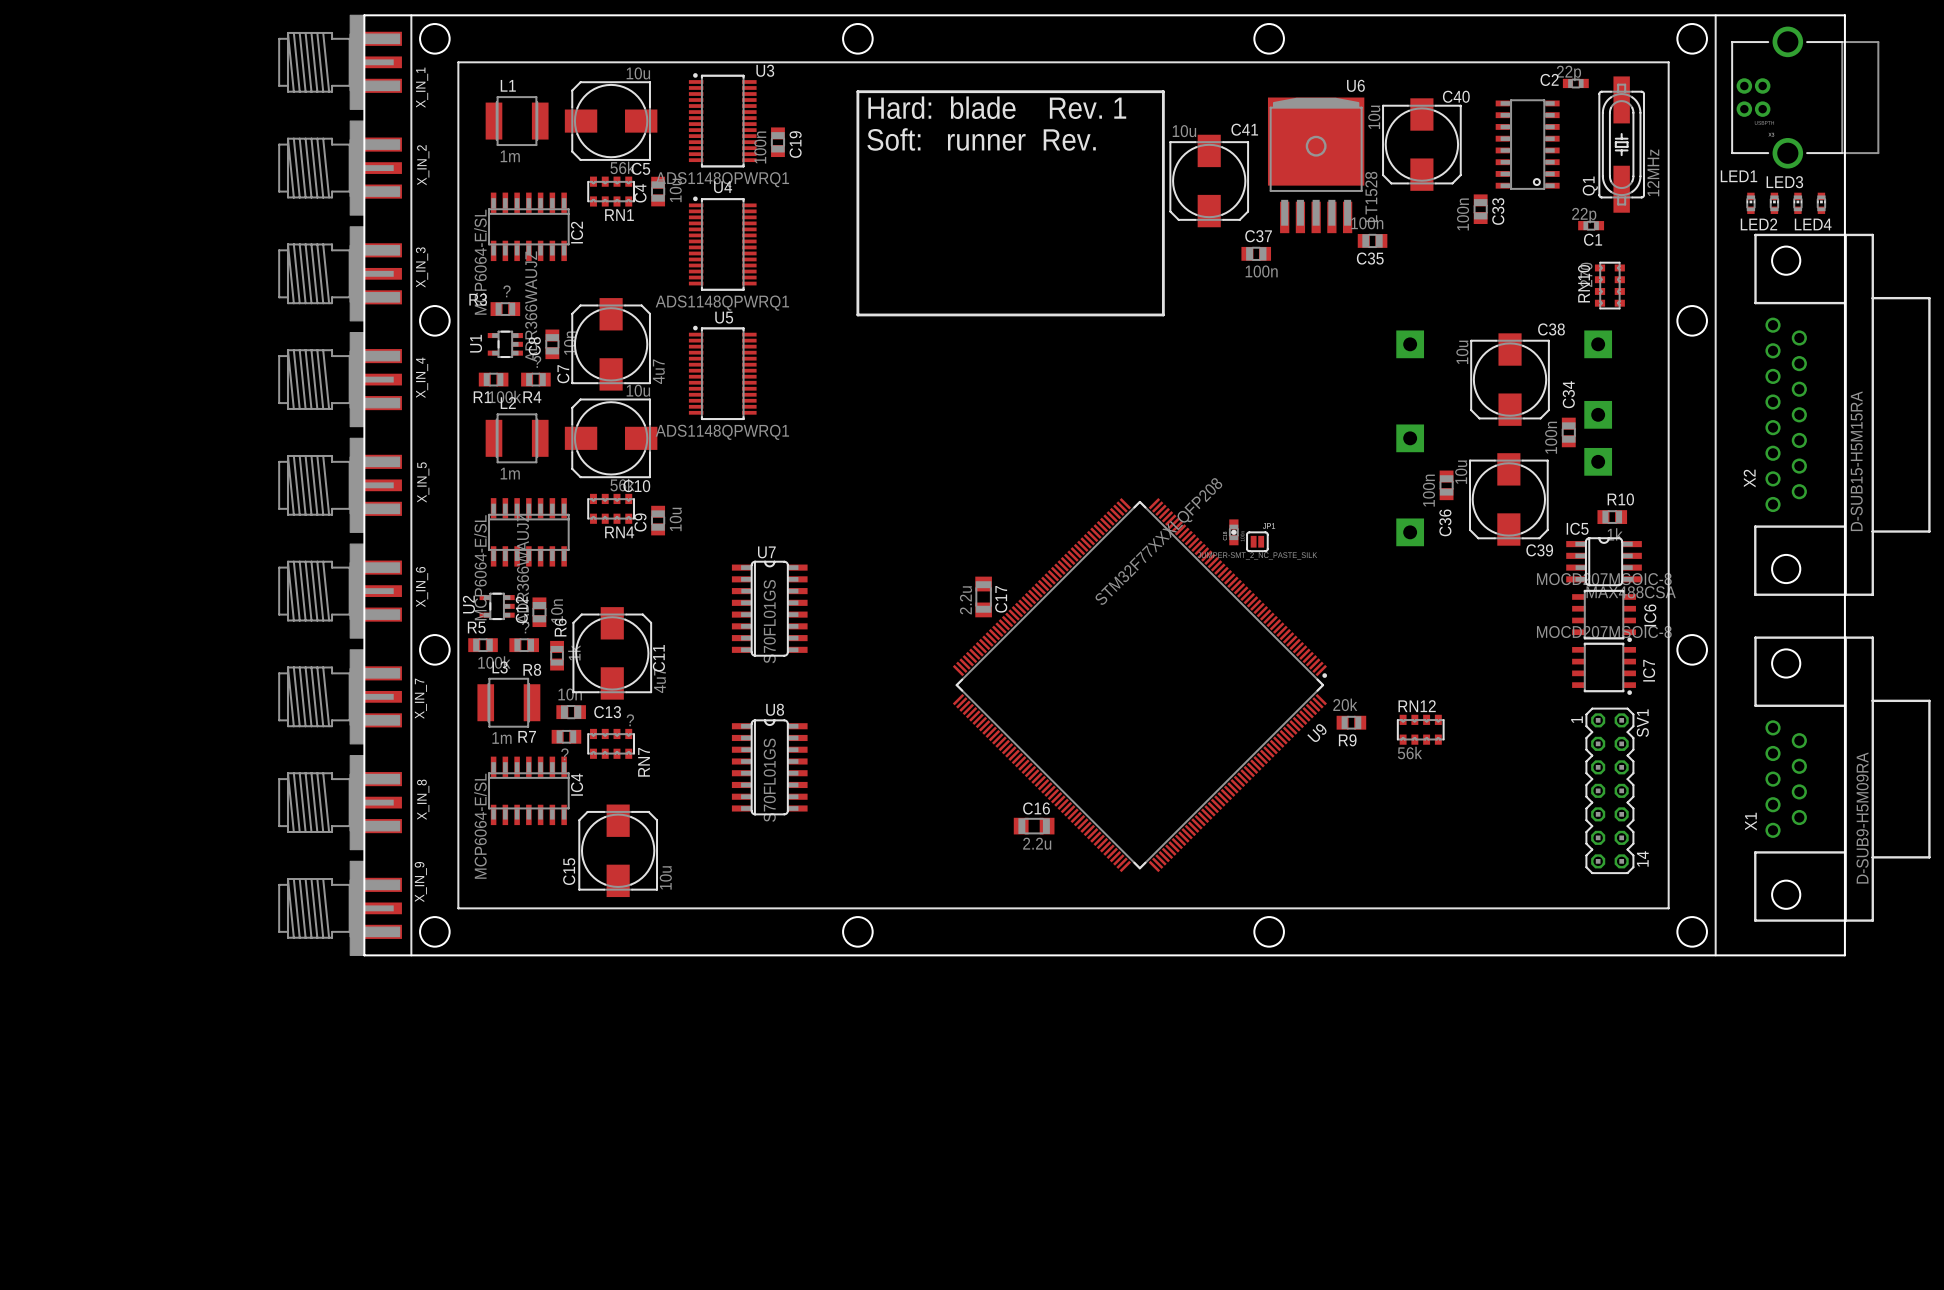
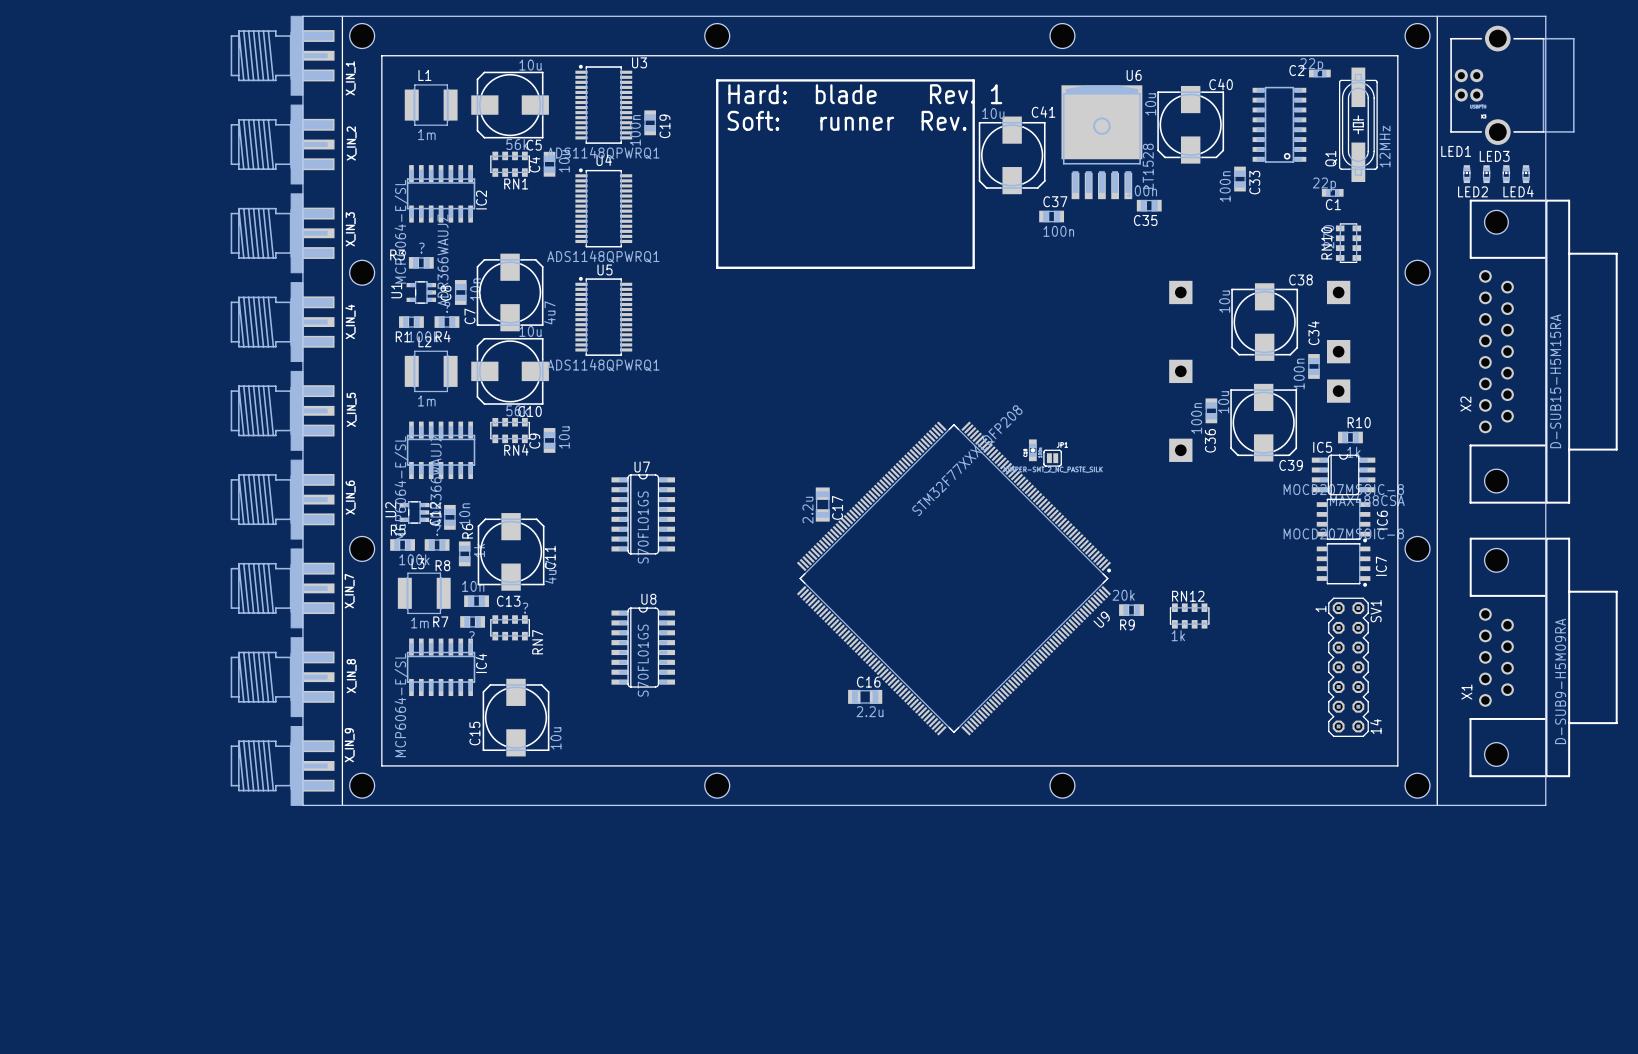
RN12 value: 56k (1409, 753) -> 1k (1178, 635)

